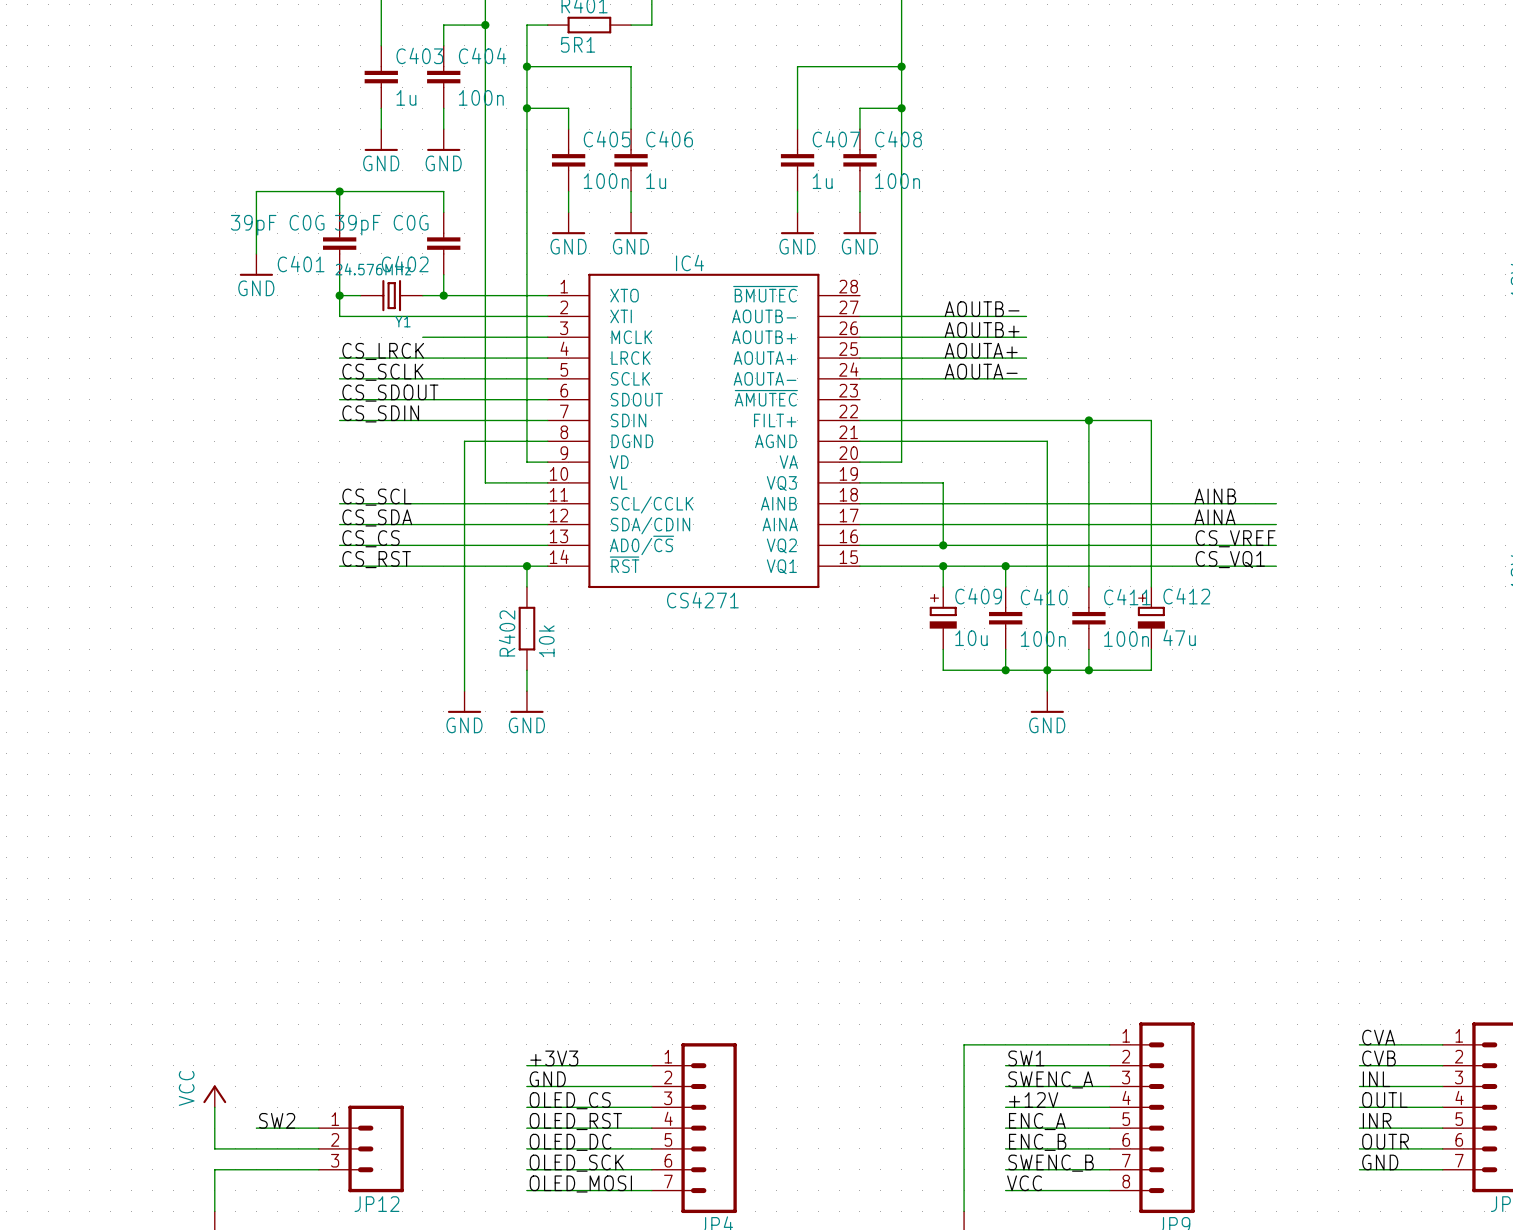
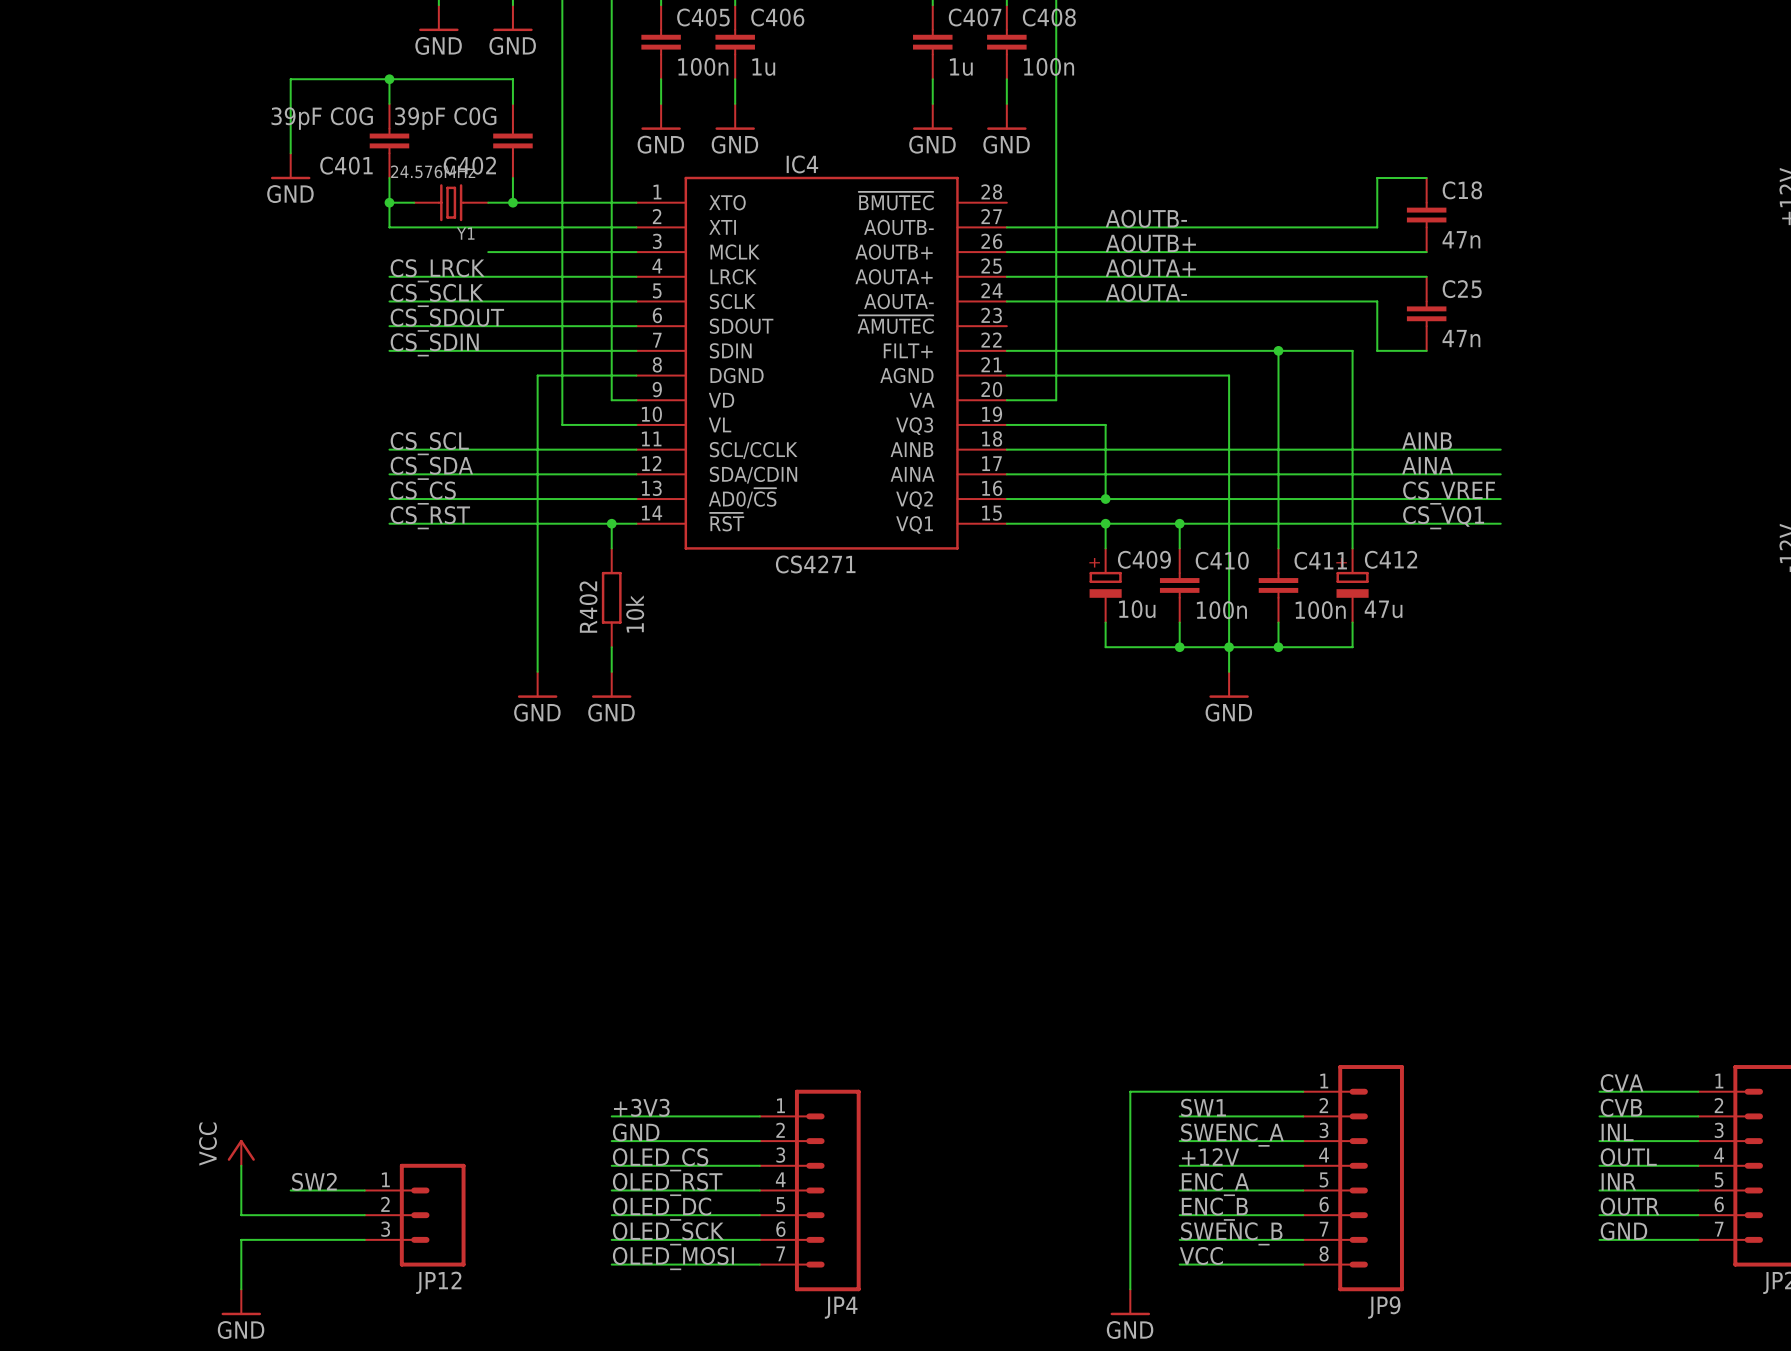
wire: none -> (1426, 178) (1377, 178) (1377, 227) (1204, 227)
C18: none -> 47n (1426, 215)
wire: none -> (1204, 252) (1426, 252)
wire: none -> (1204, 276) (1426, 276)
wire: none -> (1204, 301) (1377, 301) (1377, 350) (1426, 350)
C25: none -> 47n (1426, 313)

